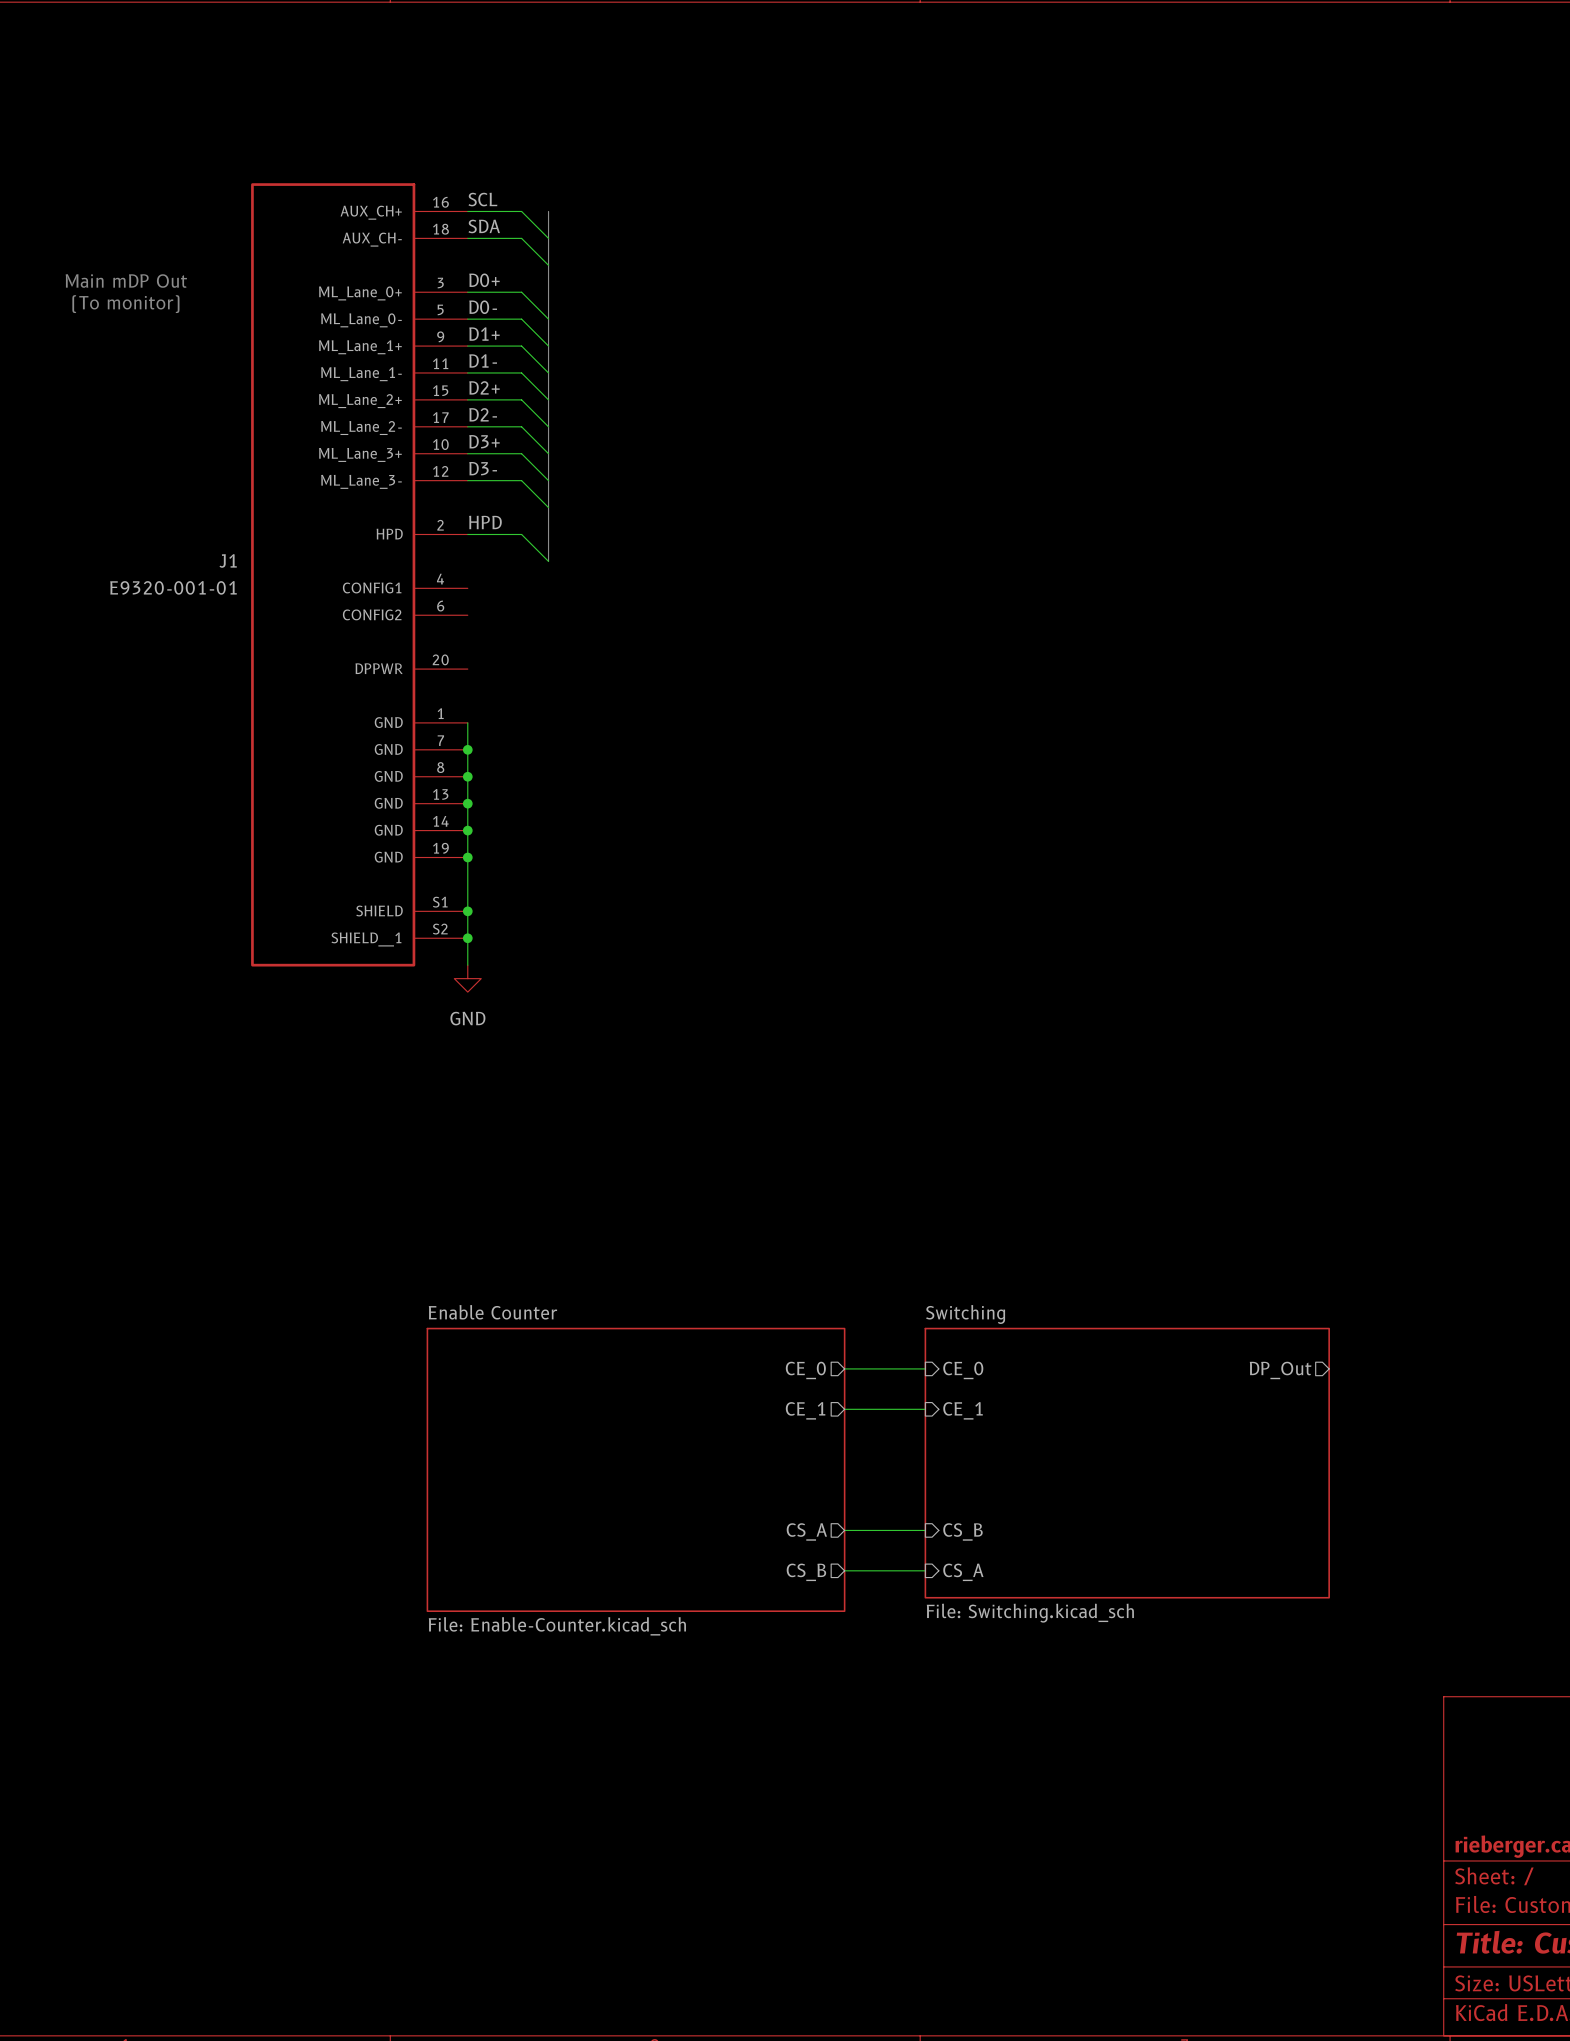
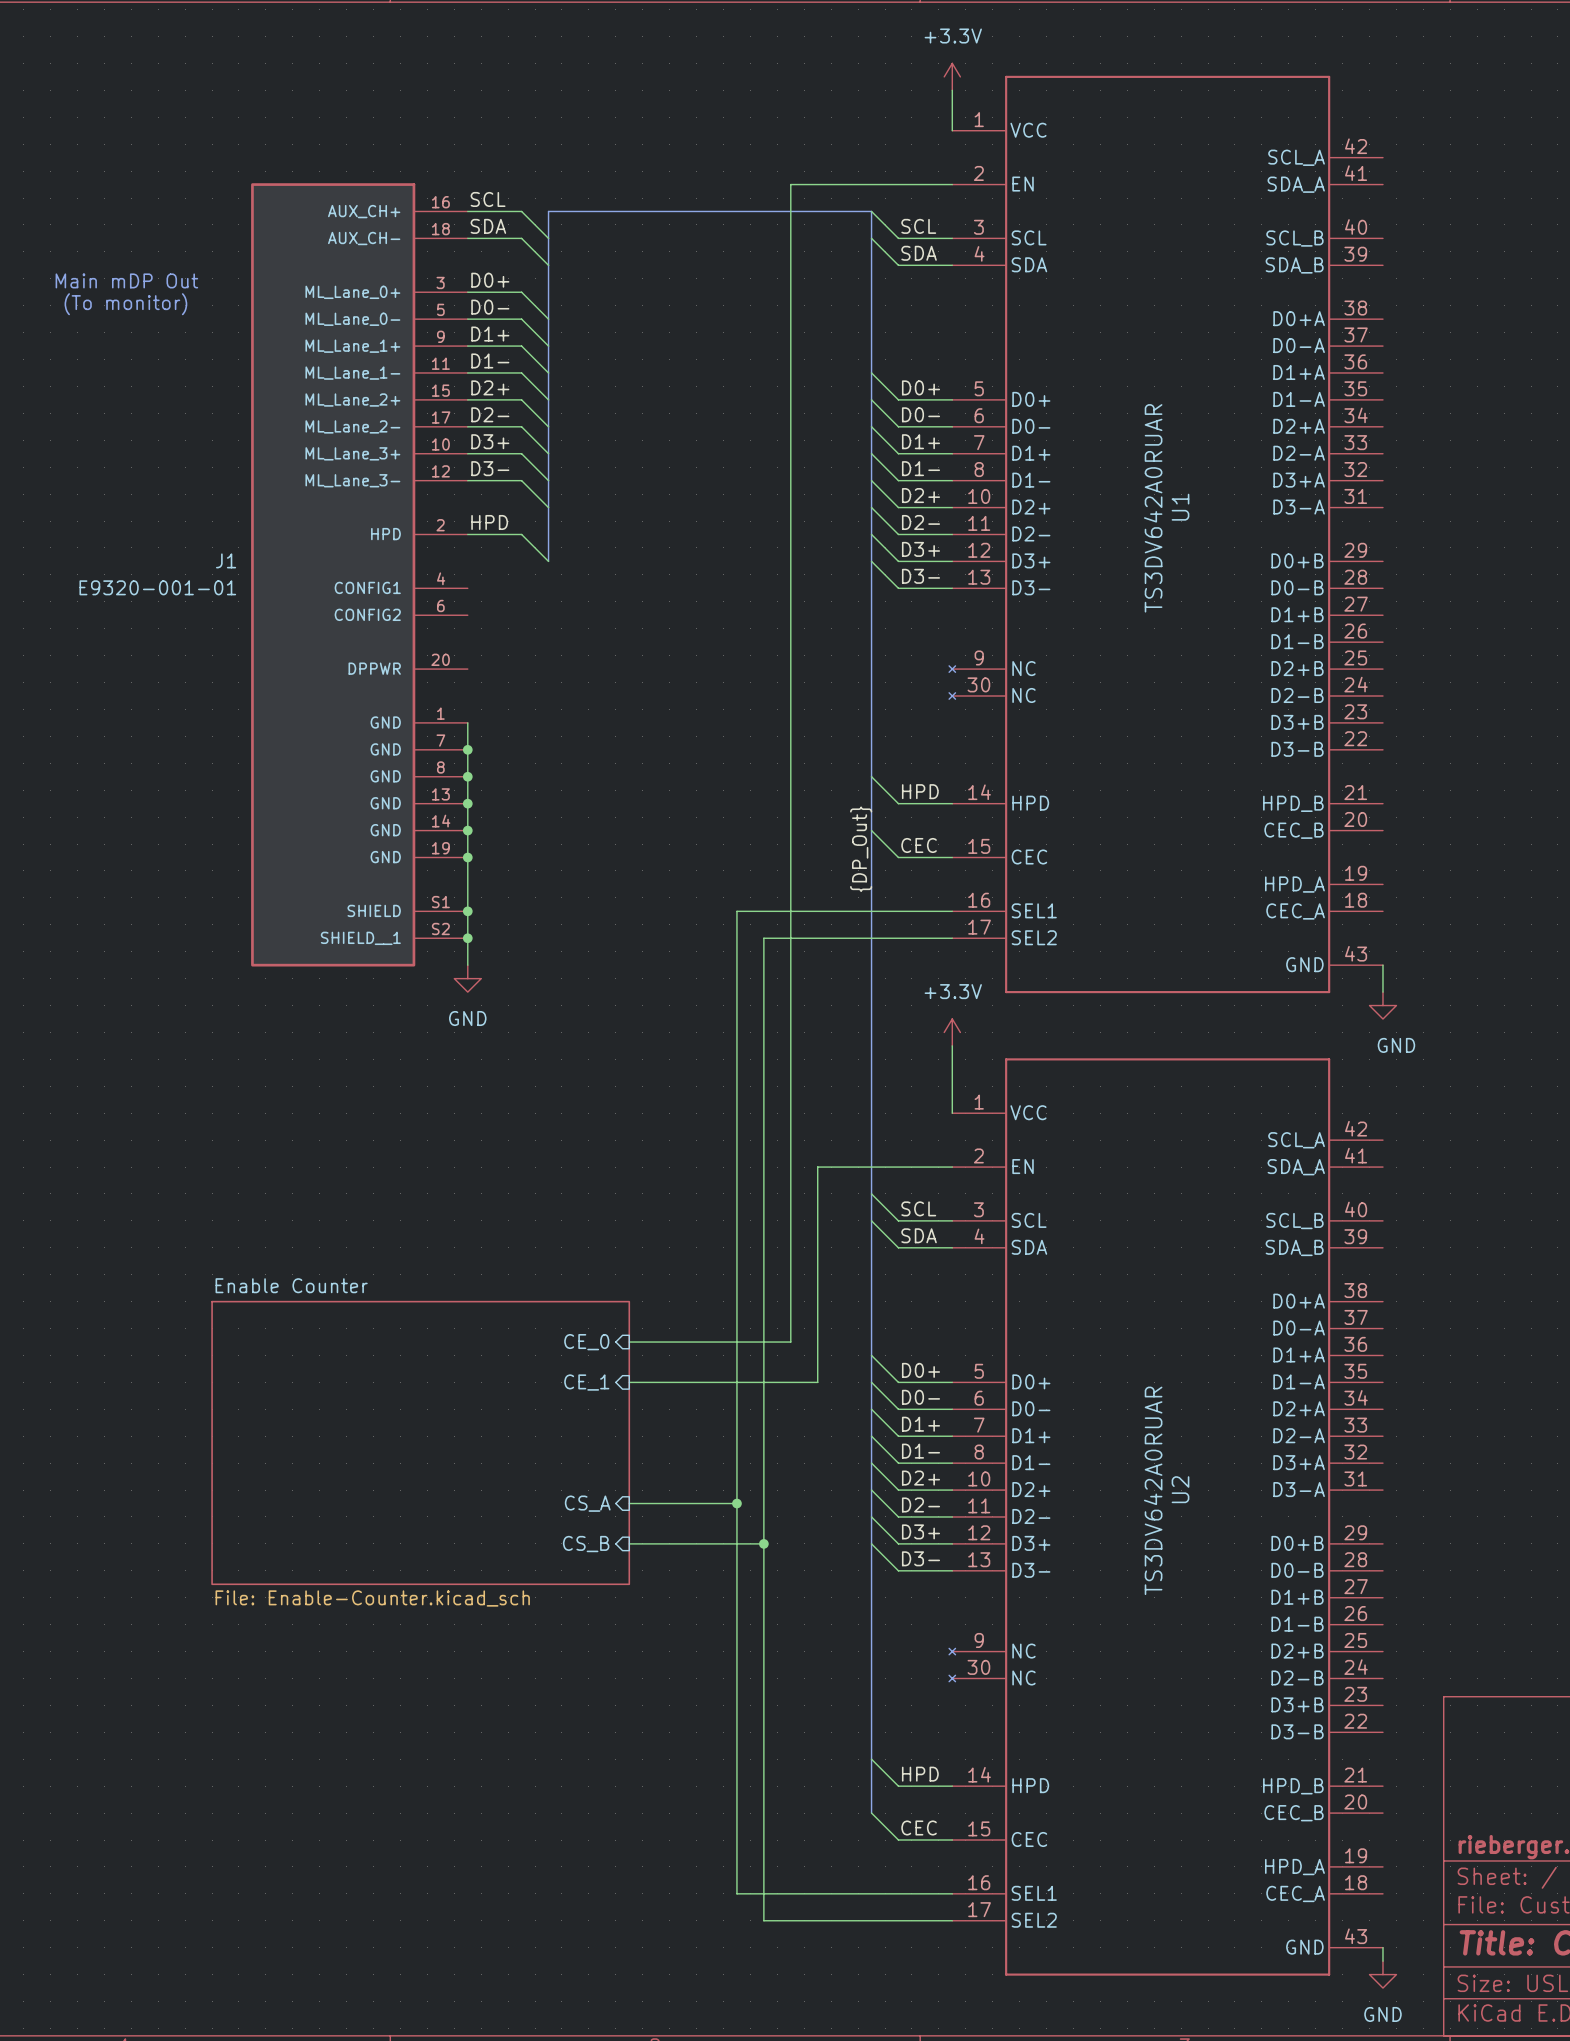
power symbol: none -> +3.3V (952, 76)
wire: none -> (952, 90) (952, 130)
wire: none -> (952, 184) (790, 184) (790, 1342) (629, 1342)
bus: none -> (548, 211) (871, 211) (871, 1813)
wire: none -> (871, 211) (898, 238) (952, 238)
label: none -> SCL (918, 226)
wire: none -> (871, 238) (898, 265) (952, 265)
label: none -> SDA (919, 253)
wire: none -> (871, 372) (898, 399) (952, 399)
label: none -> D0+ (921, 387)
wire: none -> (871, 399) (898, 426) (952, 426)
label: none -> D0- (921, 414)
wire: none -> (871, 426) (898, 453) (952, 453)
label: none -> D1+ (921, 441)
wire: none -> (871, 453) (898, 480) (952, 480)
label: none -> D1- (921, 468)
wire: none -> (871, 480) (898, 507) (952, 507)
label: none -> D2+ (921, 495)
wire: none -> (871, 507) (898, 534) (952, 534)
label: none -> D2- (921, 522)
wire: none -> (871, 534) (898, 561) (952, 561)
U1: none -> TS3DV642A0RUAR (1166, 534)
label: none -> D3+ (921, 549)
wire: none -> (871, 561) (898, 588) (952, 588)
label: none -> D3- (921, 576)
wire: none -> (871, 776) (898, 803) (952, 803)
label: none -> HPD (920, 791)
wire: none -> (871, 830) (898, 857) (952, 857)
label: none -> CEC (919, 845)
label: none -> {DP_Out} (861, 849)
wire: none -> (952, 911) (736, 911) (736, 1893) (952, 1893)
wire: none -> (952, 938) (763, 938) (763, 1920) (952, 1920)
wire: none -> (1382, 965) (1382, 992)
power symbol: none -> GND (1382, 1005)
power symbol: none -> +3.3V (952, 1032)
wire: none -> (952, 1045) (952, 1113)
wire: none -> (952, 1167) (817, 1167) (817, 1382) (629, 1382)
wire: none -> (871, 1193) (898, 1220) (952, 1220)
label: none -> SCL (918, 1208)
wire: none -> (871, 1220) (898, 1247) (952, 1247)
label: none -> SDA (919, 1235)
sheet pin: none -> CE_0 (586, 1342)
wire: none -> (871, 1355) (898, 1382) (952, 1382)
wire: (844, 1368) (925, 1368) -> none
sheet pin: CE_0 (805, 1370) -> none
label: none -> D0+ (921, 1370)
sheet pin: CE_0 (963, 1370) -> none
sheet pin: DP_Out (1280, 1370) -> none
sheet pin: none -> CE_1 (586, 1382)
label: none -> D0- (921, 1397)
wire: (844, 1409) (898, 1409) -> (871, 1382) (898, 1409)
wire: none -> (871, 1409) (898, 1436) (952, 1436)
wire: none -> (925, 1409) (952, 1409)
sheet pin: CE_1 (805, 1410) -> none
sheet pin: CE_1 (963, 1410) -> none
label: none -> D1+ (921, 1424)
wire: none -> (871, 1436) (898, 1463) (952, 1463)
label: none -> D1- (921, 1451)
wire: none -> (871, 1463) (898, 1490) (952, 1490)
sheet Switching: File: Switching.kicad_sch (1127, 1463) -> none
sheet Enable Counter position: (636, 1469) -> (420, 1442)
label: none -> D2+ (921, 1478)
wire: none -> (871, 1490) (898, 1516) (952, 1516)
wire: none -> (629, 1503) (736, 1503)
junction: none -> (736, 1503)
label: none -> D2- (921, 1504)
sheet pin: none -> CS_A (587, 1503)
wire: none -> (871, 1516) (898, 1543) (952, 1543)
U2: none -> TS3DV642A0RUAR (1166, 1516)
wire: (844, 1530) (925, 1530) -> none
sheet pin: CS_A (806, 1531) -> none
label: none -> D3+ (921, 1531)
sheet pin: CS_B (962, 1531) -> none
wire: none -> (629, 1543) (763, 1543)
junction: none -> (763, 1543)
sheet pin: none -> CS_B (586, 1544)
label: none -> D3- (921, 1558)
wire: (844, 1570) (898, 1570) -> (871, 1543) (898, 1570)
wire: none -> (925, 1570) (952, 1570)
sheet pin: CS_B (806, 1572) -> none
sheet pin: CS_A (963, 1572) -> none
wire: none -> (871, 1759) (898, 1786) (952, 1786)
label: none -> HPD (920, 1774)
wire: none -> (871, 1813) (898, 1840) (952, 1840)
label: none -> CEC (919, 1827)
wire: none -> (1382, 1947) (1382, 1961)
power symbol: none -> GND (1382, 1974)

